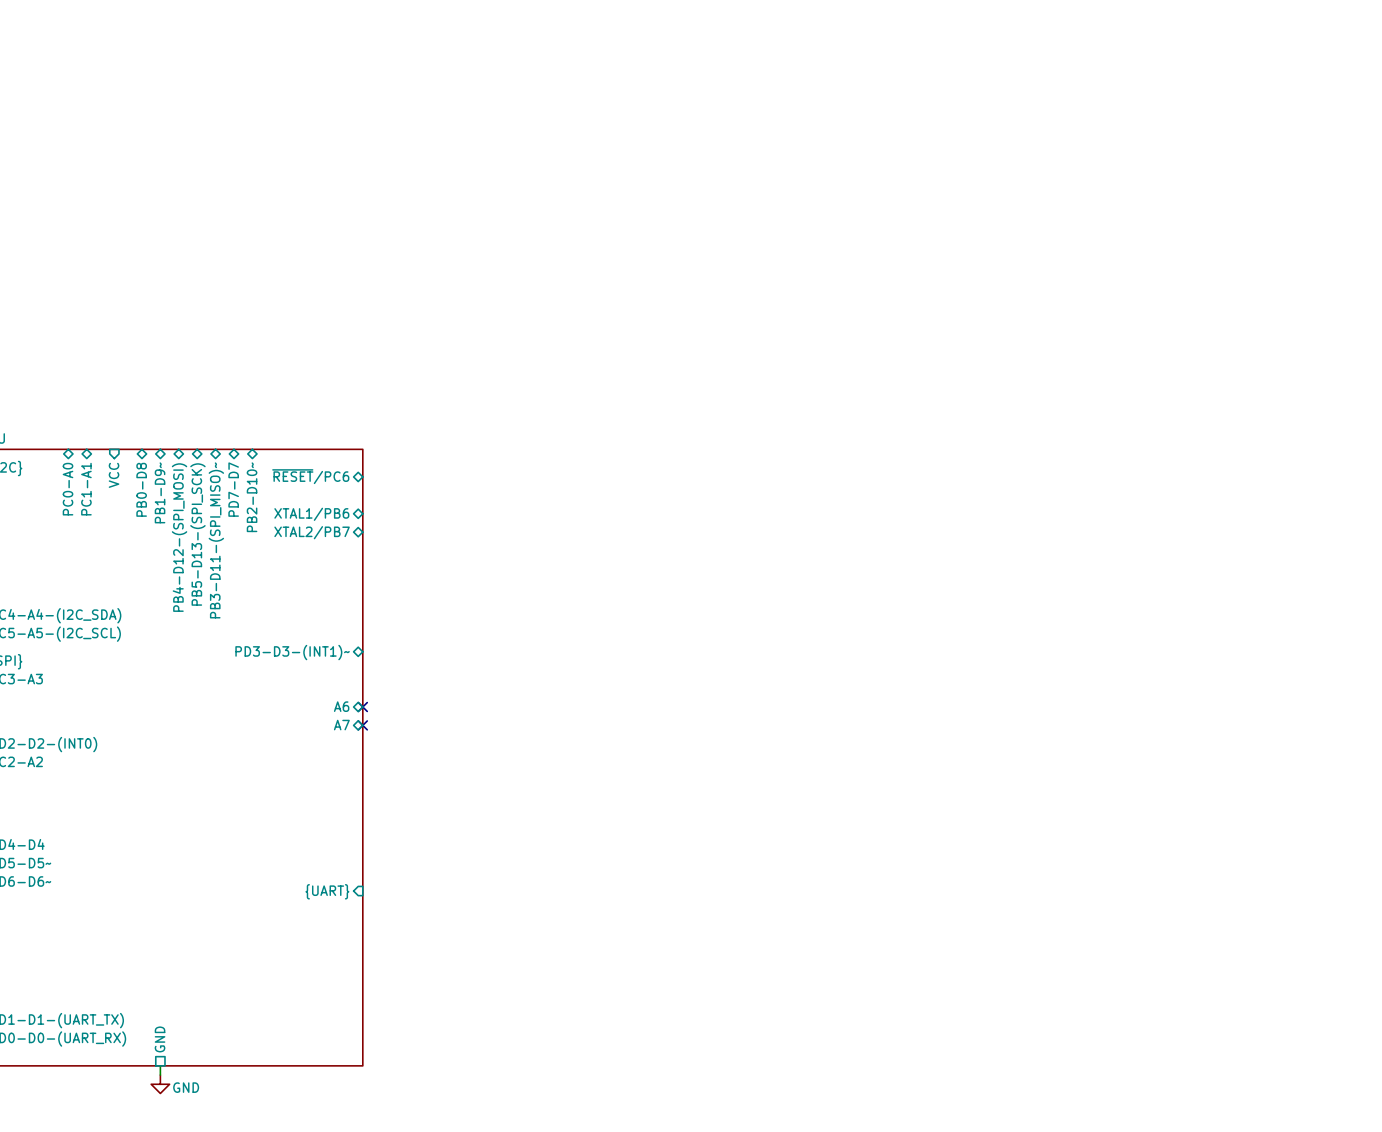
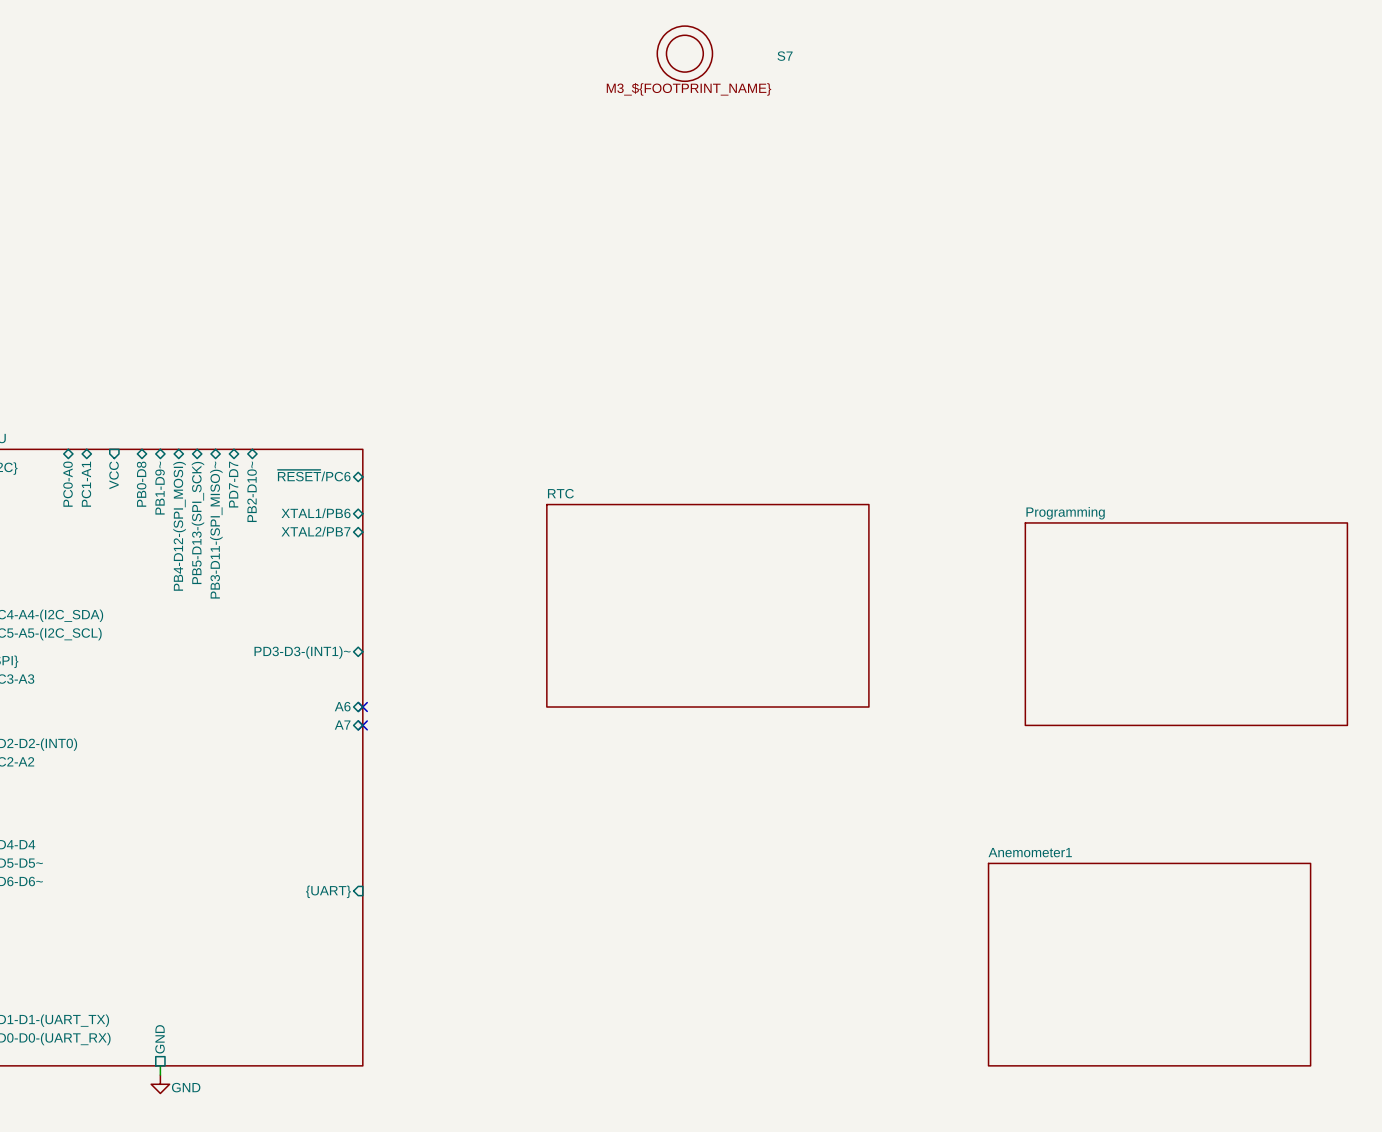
S7: none -> (684, 53)
sheet RTC: none -> (707, 605)
sheet Programming: none -> (1186, 624)
sheet Anemometer1: none -> (1149, 964)

